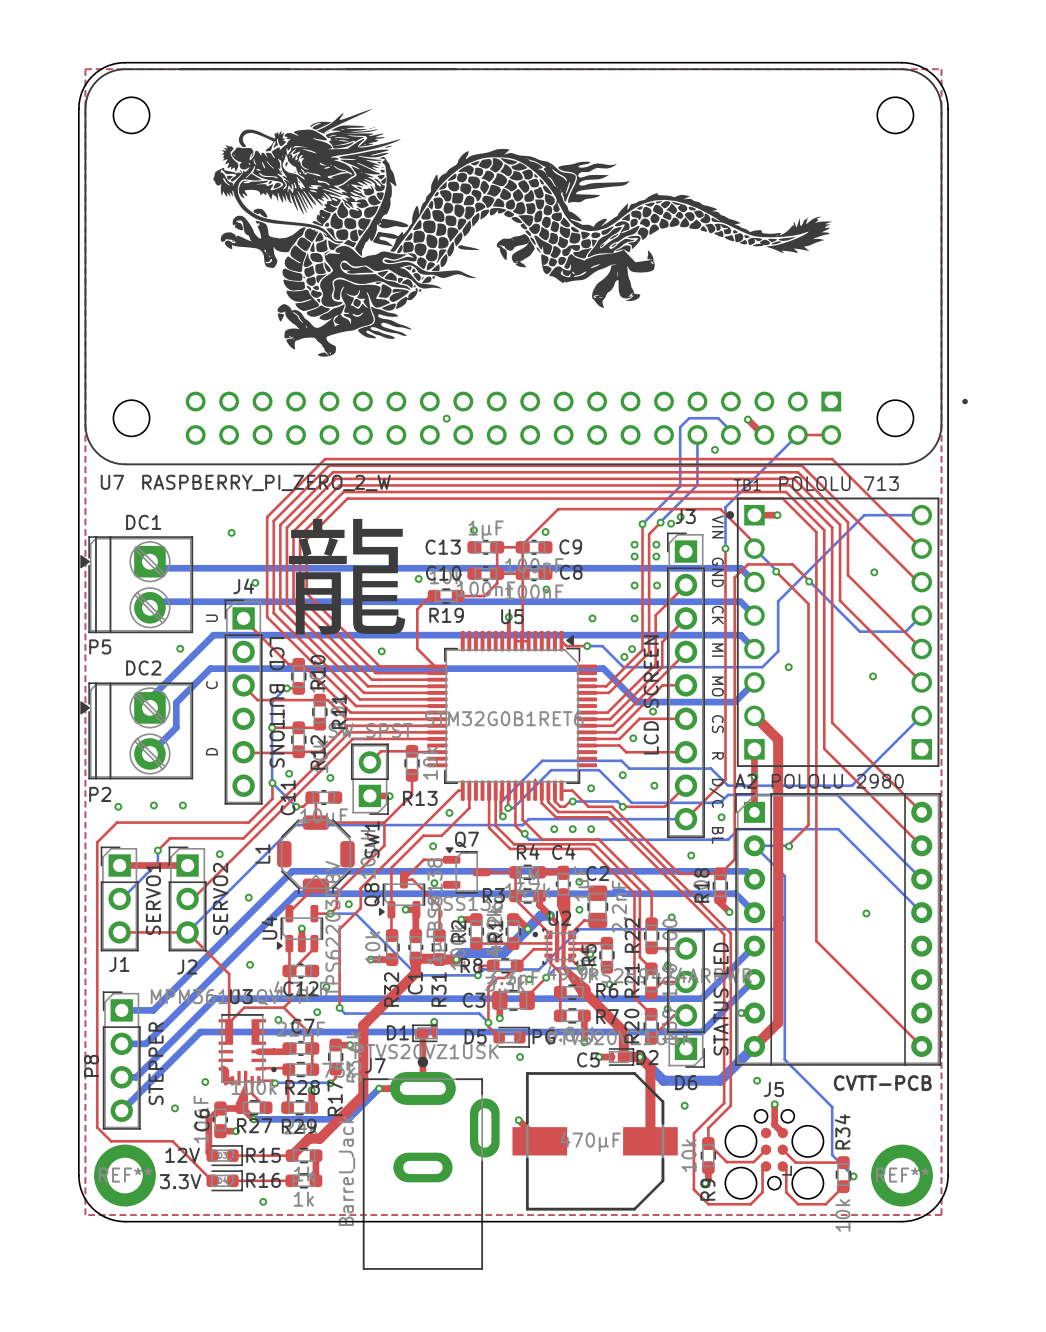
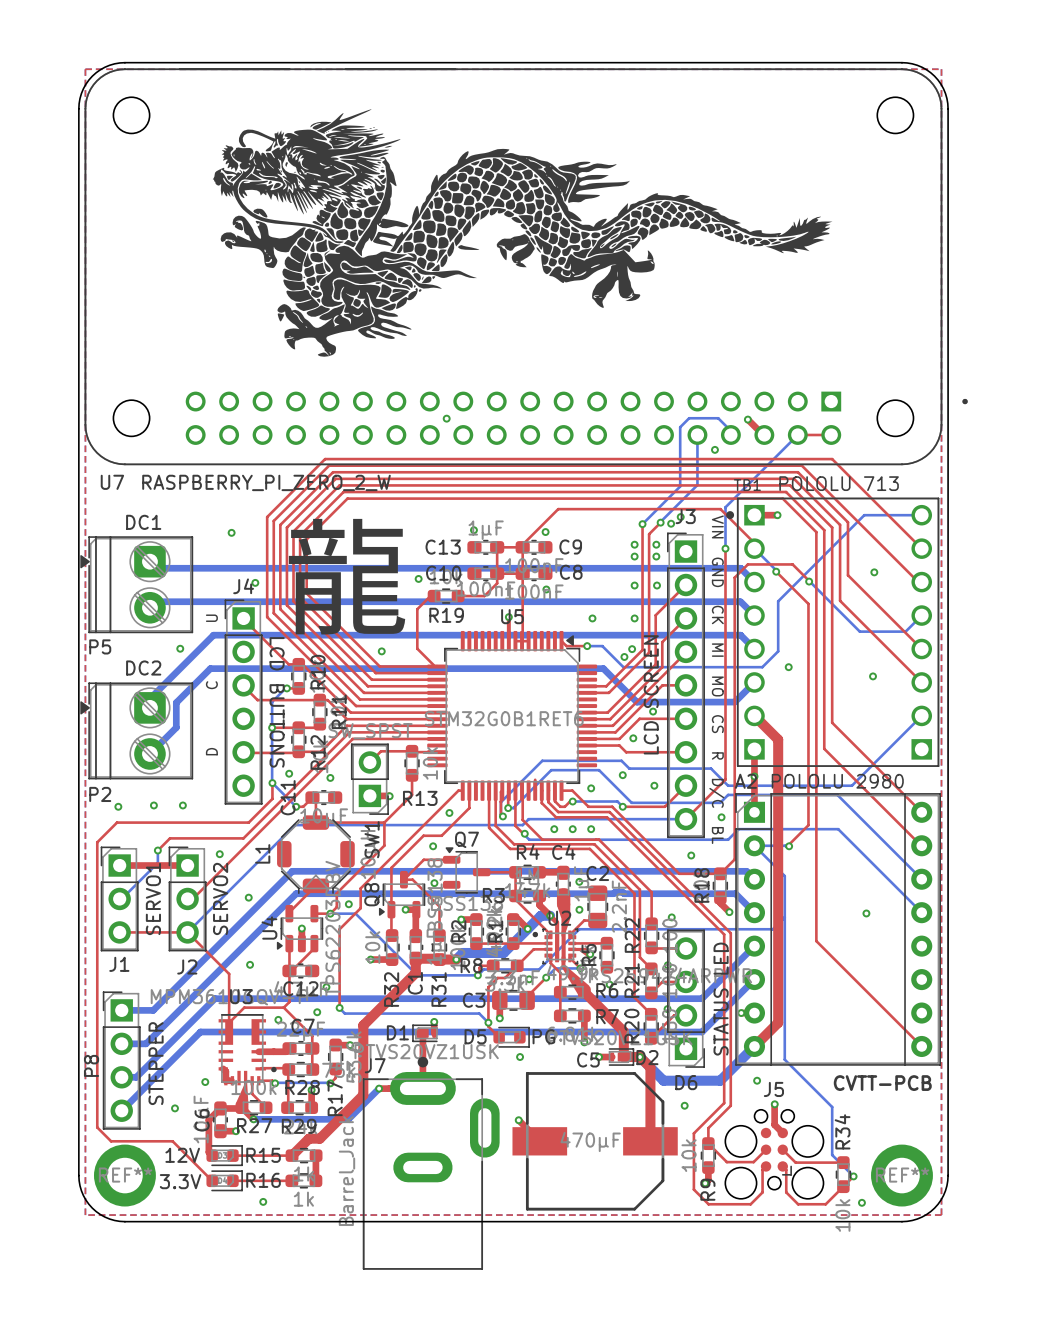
via: none -> (861, 1202)

